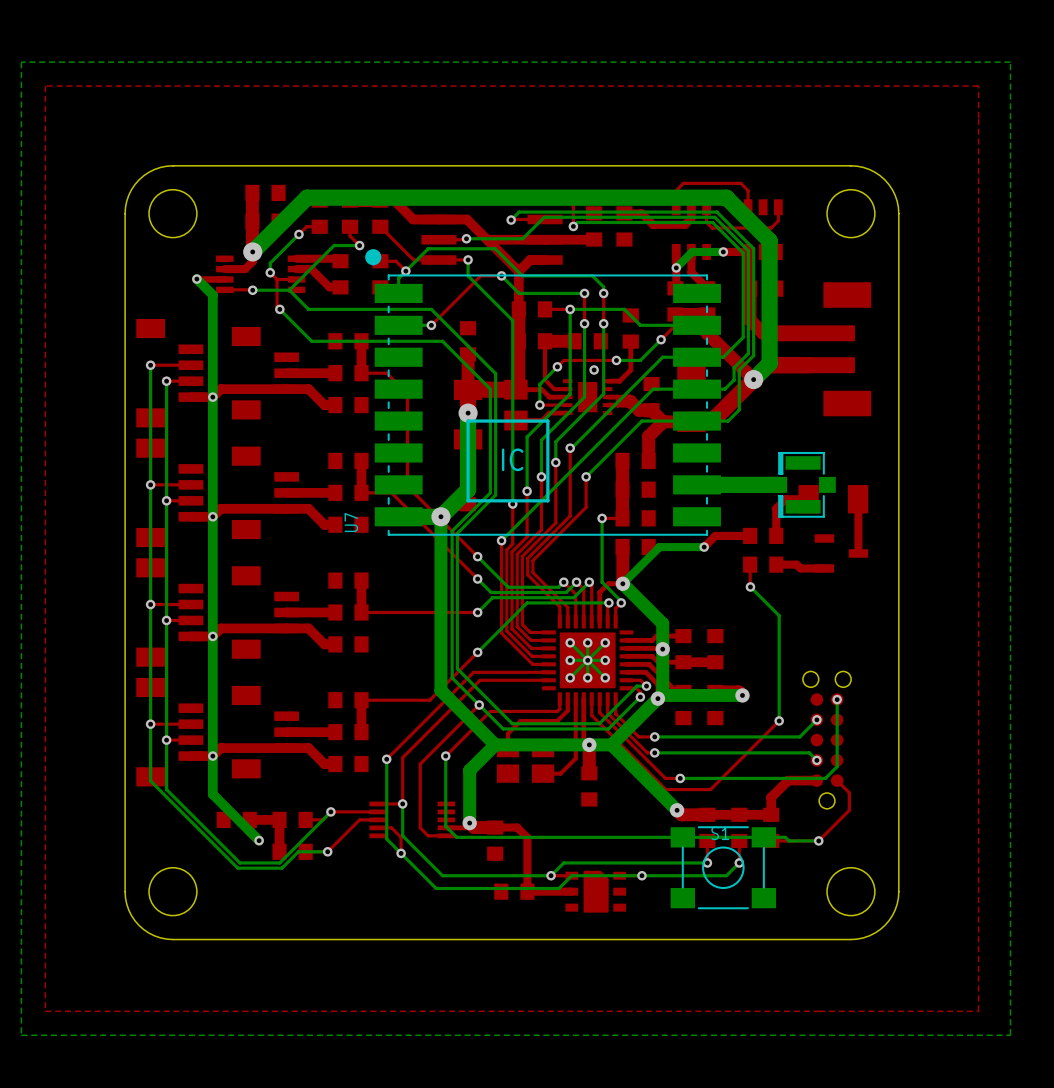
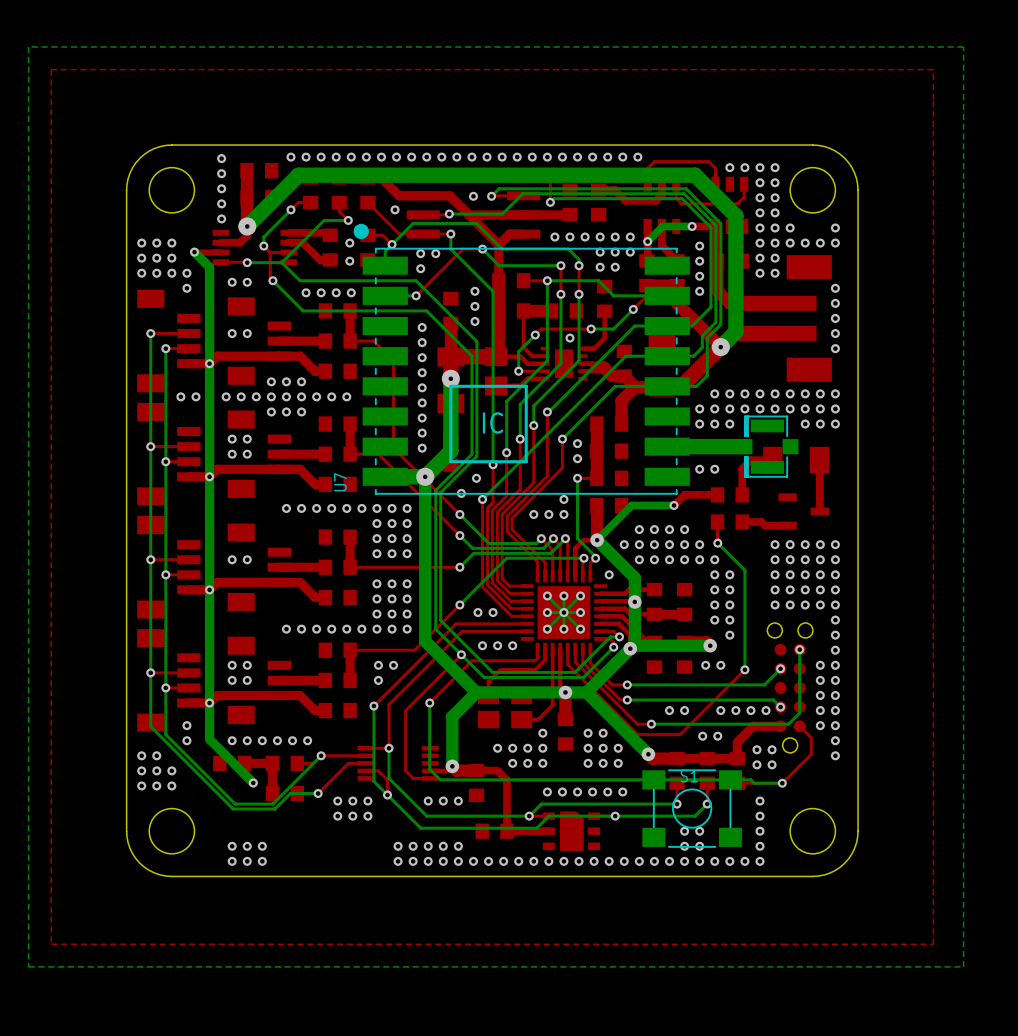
via: none -> (290, 157)
via: none -> (306, 157)
via: none -> (321, 157)
via: none -> (336, 157)
via: none -> (351, 157)
via: none -> (366, 157)
via: none -> (381, 157)
via: none -> (396, 157)
via: none -> (411, 157)
via: none -> (426, 157)
via: none -> (441, 157)
via: none -> (456, 157)
via: none -> (471, 157)
via: none -> (487, 157)
via: none -> (502, 157)
via: none -> (517, 157)
via: none -> (532, 157)
via: none -> (547, 157)
via: none -> (562, 157)
via: none -> (577, 157)
via: none -> (592, 157)
via: none -> (607, 157)
via: none -> (622, 157)
via: none -> (637, 157)
via: none -> (221, 158)
via: none -> (729, 167)
via: none -> (744, 167)
via: none -> (760, 167)
via: none -> (775, 167)
via: none -> (221, 173)
via: none -> (760, 182)
via: none -> (775, 182)
via: none -> (221, 188)
via: none -> (473, 196)
via: none -> (760, 197)
via: none -> (775, 197)
via: none -> (221, 203)
via: none -> (395, 209)
via: none -> (760, 212)
via: none -> (775, 212)
via: none -> (221, 218)
via: none -> (760, 227)
via: none -> (775, 227)
via: none -> (790, 227)
via: none -> (835, 227)
via: none -> (554, 237)
via: none -> (569, 237)
via: none -> (585, 237)
via: none -> (600, 237)
via: none -> (615, 237)
via: none -> (630, 237)
via: none -> (141, 243)
via: none -> (156, 243)
via: none -> (171, 243)
via: none -> (349, 243)
via: none -> (760, 243)
via: none -> (775, 243)
via: none -> (790, 243)
via: none -> (805, 243)
via: none -> (820, 243)
via: none -> (835, 243)
via: none -> (699, 246)
via: none -> (600, 252)
via: none -> (615, 252)
via: none -> (630, 252)
via: none -> (420, 253)
via: none -> (435, 253)
via: none -> (141, 258)
via: none -> (156, 258)
via: none -> (171, 258)
via: none -> (760, 258)
via: none -> (775, 258)
via: none -> (349, 261)
via: none -> (699, 261)
via: none -> (600, 267)
via: none -> (615, 267)
via: none -> (420, 268)
via: none -> (141, 273)
via: none -> (156, 273)
via: none -> (171, 273)
via: none -> (186, 273)
via: none -> (760, 273)
via: none -> (775, 273)
via: none -> (699, 276)
via: none -> (232, 282)
via: none -> (247, 282)
via: none -> (186, 288)
via: none -> (835, 288)
via: none -> (474, 291)
via: none -> (699, 291)
via: none -> (306, 292)
via: none -> (321, 292)
via: none -> (336, 292)
via: none -> (351, 292)
via: none -> (835, 303)
via: none -> (474, 306)
via: none -> (835, 318)
via: none -> (474, 321)
via: none -> (422, 327)
via: none -> (232, 333)
via: none -> (247, 333)
via: none -> (835, 333)
via: none -> (422, 342)
via: none -> (835, 348)
via: none -> (422, 357)
via: none -> (422, 372)
via: none -> (271, 381)
via: none -> (286, 381)
via: none -> (301, 381)
via: none -> (422, 387)
via: none -> (714, 393)
via: none -> (729, 393)
via: none -> (744, 393)
via: none -> (760, 393)
via: none -> (775, 393)
via: none -> (790, 393)
via: none -> (805, 393)
via: none -> (820, 393)
via: none -> (835, 393)
via: none -> (180, 396)
via: none -> (195, 396)
via: none -> (226, 396)
via: none -> (241, 396)
via: none -> (256, 396)
via: none -> (271, 396)
via: none -> (286, 396)
via: none -> (301, 396)
via: none -> (316, 396)
via: none -> (331, 396)
via: none -> (346, 396)
via: none -> (422, 402)
via: none -> (699, 408)
via: none -> (714, 408)
via: none -> (729, 408)
via: none -> (744, 408)
via: none -> (760, 408)
via: none -> (775, 408)
via: none -> (790, 408)
via: none -> (805, 408)
via: none -> (820, 408)
via: none -> (835, 408)
via: none -> (271, 411)
via: none -> (286, 411)
via: none -> (301, 411)
via: none -> (422, 417)
via: none -> (699, 424)
via: none -> (714, 424)
via: none -> (729, 424)
via: none -> (805, 424)
via: none -> (820, 424)
via: none -> (835, 424)
via: none -> (422, 433)
via: none -> (232, 439)
via: none -> (247, 439)
via: none -> (577, 443)
via: none -> (422, 448)
via: none -> (232, 454)
via: none -> (247, 454)
via: none -> (577, 458)
via: none -> (699, 469)
via: none -> (714, 469)
via: none -> (476, 478)
via: none -> (461, 493)
via: none -> (563, 499)
via: none -> (286, 508)
via: none -> (301, 508)
via: none -> (316, 508)
via: none -> (331, 508)
via: none -> (346, 508)
via: none -> (361, 508)
via: none -> (376, 508)
via: none -> (392, 508)
via: none -> (407, 508)
via: none -> (533, 514)
via: none -> (548, 514)
via: none -> (563, 514)
via: none -> (376, 523)
via: none -> (392, 523)
via: none -> (407, 523)
via: none -> (639, 529)
via: none -> (654, 529)
via: none -> (669, 529)
via: none -> (684, 529)
via: none -> (376, 538)
via: none -> (392, 538)
via: none -> (407, 538)
via: none -> (624, 544)
via: none -> (639, 544)
via: none -> (654, 544)
via: none -> (669, 544)
via: none -> (684, 544)
via: none -> (699, 544)
via: none -> (775, 544)
via: none -> (790, 544)
via: none -> (805, 544)
via: none -> (820, 544)
via: none -> (835, 544)
via: none -> (376, 553)
via: none -> (392, 553)
via: none -> (407, 553)
via: none -> (232, 559)
via: none -> (247, 559)
via: none -> (639, 559)
via: none -> (654, 559)
via: none -> (669, 559)
via: none -> (684, 559)
via: none -> (699, 559)
via: none -> (714, 559)
via: none -> (775, 559)
via: none -> (790, 559)
via: none -> (805, 559)
via: none -> (820, 559)
via: none -> (835, 559)
via: none -> (609, 574)
via: none -> (714, 574)
via: none -> (729, 574)
via: none -> (775, 574)
via: none -> (790, 574)
via: none -> (805, 574)
via: none -> (820, 574)
via: none -> (835, 574)
via: none -> (376, 583)
via: none -> (392, 583)
via: none -> (407, 583)
via: none -> (714, 589)
via: none -> (729, 589)
via: none -> (775, 589)
via: none -> (790, 589)
via: none -> (805, 589)
via: none -> (820, 589)
via: none -> (835, 589)
via: none -> (376, 598)
via: none -> (392, 598)
via: none -> (407, 598)
via: none -> (714, 604)
via: none -> (729, 604)
via: none -> (775, 604)
via: none -> (790, 604)
via: none -> (805, 604)
via: none -> (820, 604)
via: none -> (835, 604)
via: none -> (477, 612)
via: none -> (493, 612)
via: none -> (376, 614)
via: none -> (392, 614)
via: none -> (407, 614)
via: none -> (714, 620)
via: none -> (729, 620)
via: none -> (835, 620)
via: none -> (286, 629)
via: none -> (301, 629)
via: none -> (316, 629)
via: none -> (331, 629)
via: none -> (346, 629)
via: none -> (361, 629)
via: none -> (376, 629)
via: none -> (392, 629)
via: none -> (407, 629)
via: none -> (729, 635)
via: none -> (835, 635)
via: none -> (482, 645)
via: none -> (497, 645)
via: none -> (512, 645)
via: none -> (835, 650)
via: none -> (232, 665)
via: none -> (247, 665)
via: none -> (378, 665)
via: none -> (393, 665)
via: none -> (705, 665)
via: none -> (720, 665)
via: none -> (820, 665)
via: none -> (835, 665)
via: none -> (232, 680)
via: none -> (247, 680)
via: none -> (378, 680)
via: none -> (820, 680)
via: none -> (835, 680)
via: none -> (820, 695)
via: none -> (835, 695)
via: none -> (669, 710)
via: none -> (684, 710)
via: none -> (720, 710)
via: none -> (735, 710)
via: none -> (750, 710)
via: none -> (766, 710)
via: none -> (820, 710)
via: none -> (835, 710)
via: none -> (186, 725)
via: none -> (820, 725)
via: none -> (835, 725)
via: none -> (542, 733)
via: none -> (588, 733)
via: none -> (603, 733)
via: none -> (702, 736)
via: none -> (717, 736)
via: none -> (186, 740)
via: none -> (232, 740)
via: none -> (247, 740)
via: none -> (262, 740)
via: none -> (277, 740)
via: none -> (292, 740)
via: none -> (307, 740)
via: none -> (835, 740)
via: none -> (497, 748)
via: none -> (512, 748)
via: none -> (527, 748)
via: none -> (542, 748)
via: none -> (588, 748)
via: none -> (603, 748)
via: none -> (618, 748)
via: none -> (756, 749)
via: none -> (772, 749)
via: none -> (141, 755)
via: none -> (156, 755)
via: none -> (835, 755)
via: none -> (512, 763)
via: none -> (527, 763)
via: none -> (542, 763)
via: none -> (588, 763)
via: none -> (603, 763)
via: none -> (618, 763)
via: none -> (756, 764)
via: none -> (772, 764)
via: none -> (141, 770)
via: none -> (156, 770)
via: none -> (171, 770)
via: none -> (141, 785)
via: none -> (156, 785)
via: none -> (171, 785)
via: none -> (547, 791)
via: none -> (562, 791)
via: none -> (577, 791)
via: none -> (592, 791)
via: none -> (607, 791)
via: none -> (622, 791)
via: none -> (337, 801)
via: none -> (352, 801)
via: none -> (367, 801)
via: none -> (428, 801)
via: none -> (443, 801)
via: none -> (458, 801)
via: none -> (760, 801)
via: none -> (337, 816)
via: none -> (352, 816)
via: none -> (367, 816)
via: none -> (760, 816)
via: none -> (684, 831)
via: none -> (699, 831)
via: none -> (760, 831)
via: none -> (232, 846)
via: none -> (247, 846)
via: none -> (262, 846)
via: none -> (398, 846)
via: none -> (413, 846)
via: none -> (428, 846)
via: none -> (443, 846)
via: none -> (458, 846)
via: none -> (684, 846)
via: none -> (699, 846)
via: none -> (760, 846)
via: none -> (232, 861)
via: none -> (247, 861)
via: none -> (262, 861)
via: none -> (398, 861)
via: none -> (413, 861)
via: none -> (428, 861)
via: none -> (443, 861)
via: none -> (458, 861)
via: none -> (473, 861)
via: none -> (488, 861)
via: none -> (503, 861)
via: none -> (518, 861)
via: none -> (533, 861)
via: none -> (548, 861)
via: none -> (563, 861)
via: none -> (579, 861)
via: none -> (594, 861)
via: none -> (609, 861)
via: none -> (624, 861)
via: none -> (639, 861)
via: none -> (654, 861)
via: none -> (669, 861)
via: none -> (684, 861)
via: none -> (699, 861)
via: none -> (714, 861)
via: none -> (729, 861)
via: none -> (744, 861)
via: none -> (760, 861)

